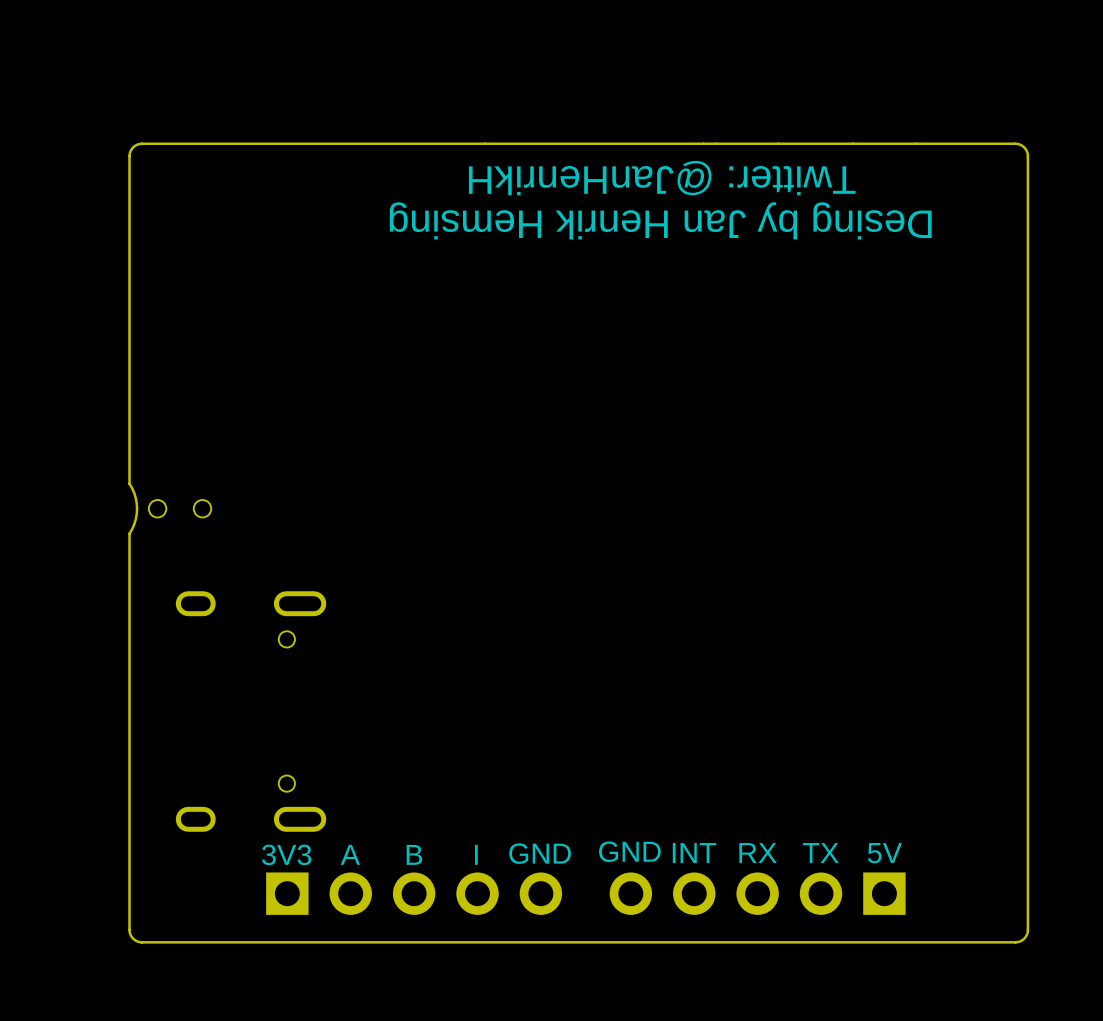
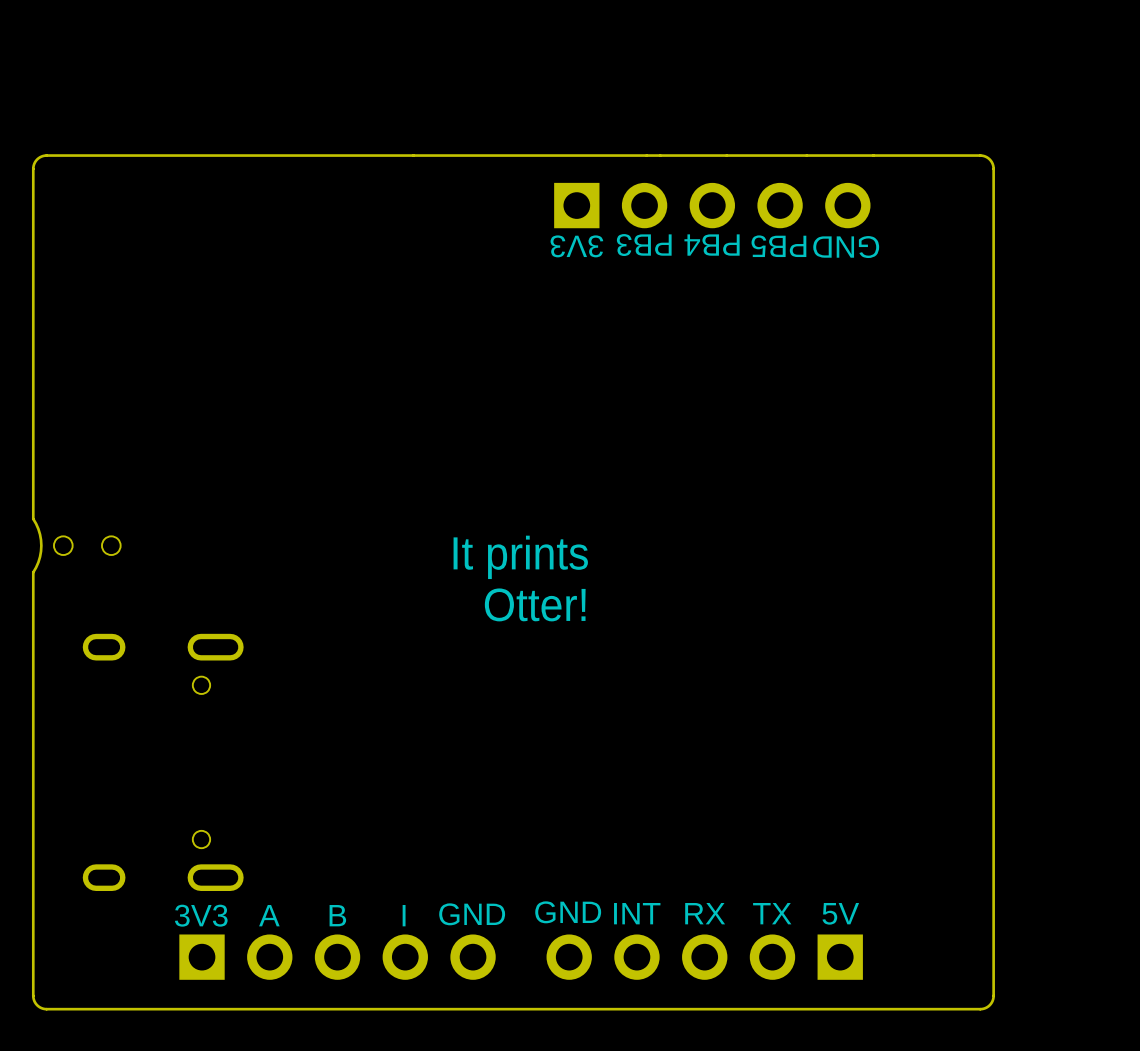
text: Twitter: @JanHenrikH (662, 178) -> none
part: none -> (712, 205)
text: Desing by Jan Henrik Hemsing (660, 220) -> none
text: none -> PB3 (644, 245)
text: none -> PB4 (712, 245)
text: none -> 3V3 (576, 246)
text: none -> PB5 (778, 246)
text: none -> GND (846, 247)
text: none -> It prints (520, 557)
text: none -> Otter! (535, 604)

